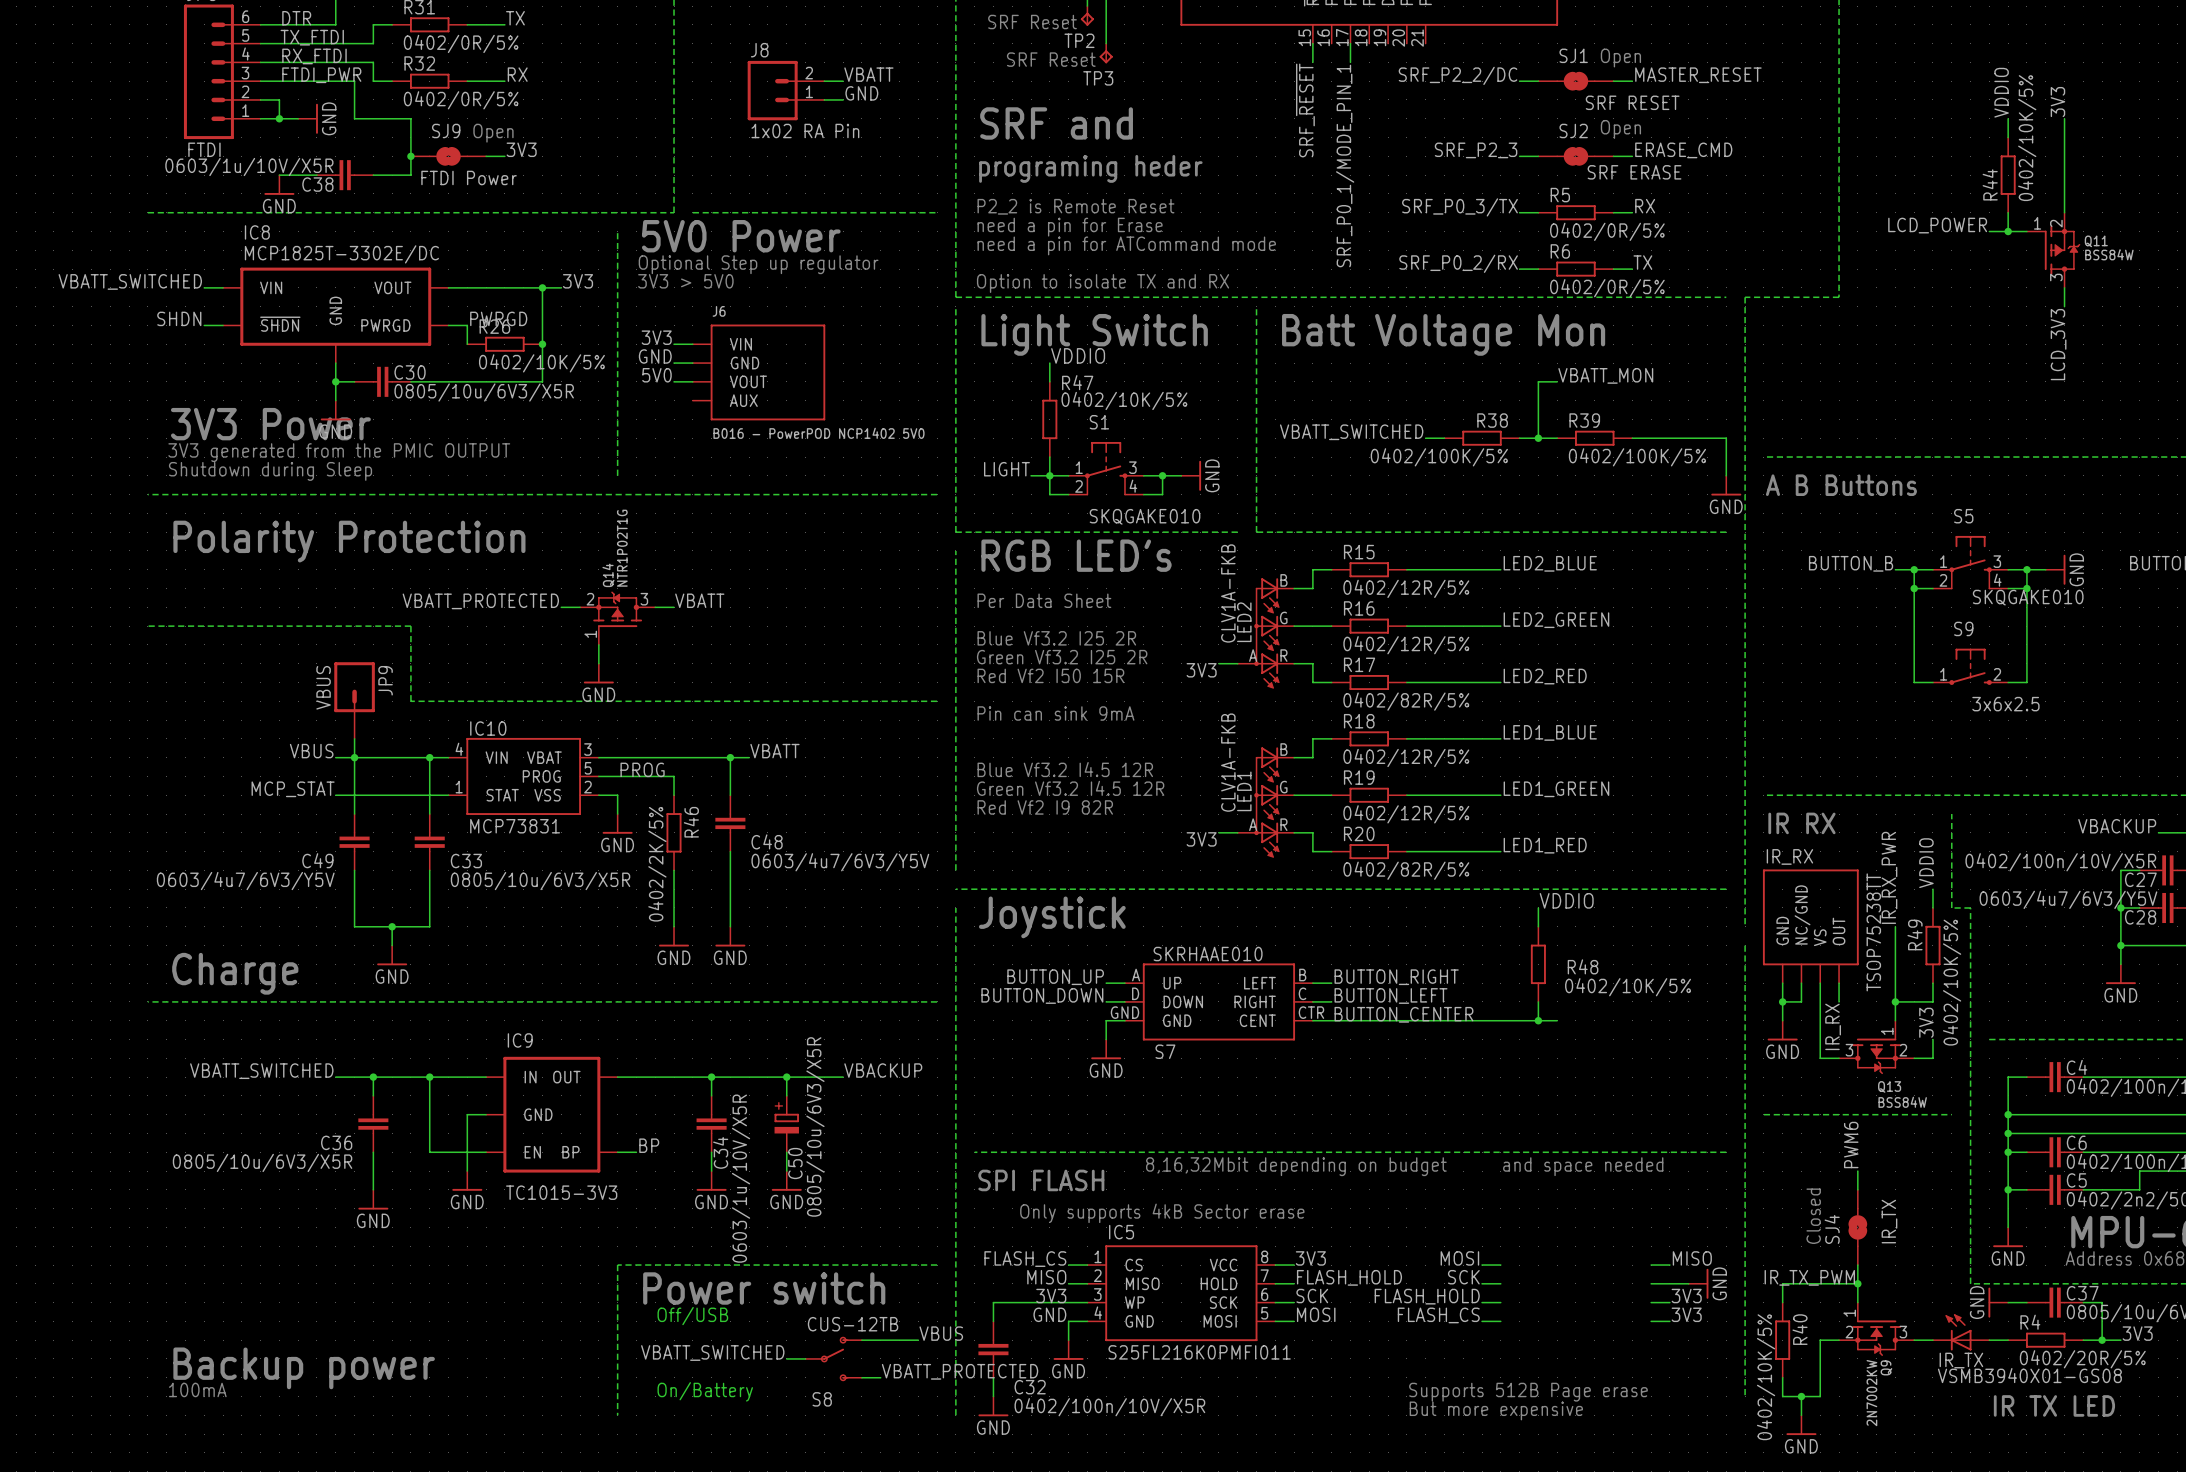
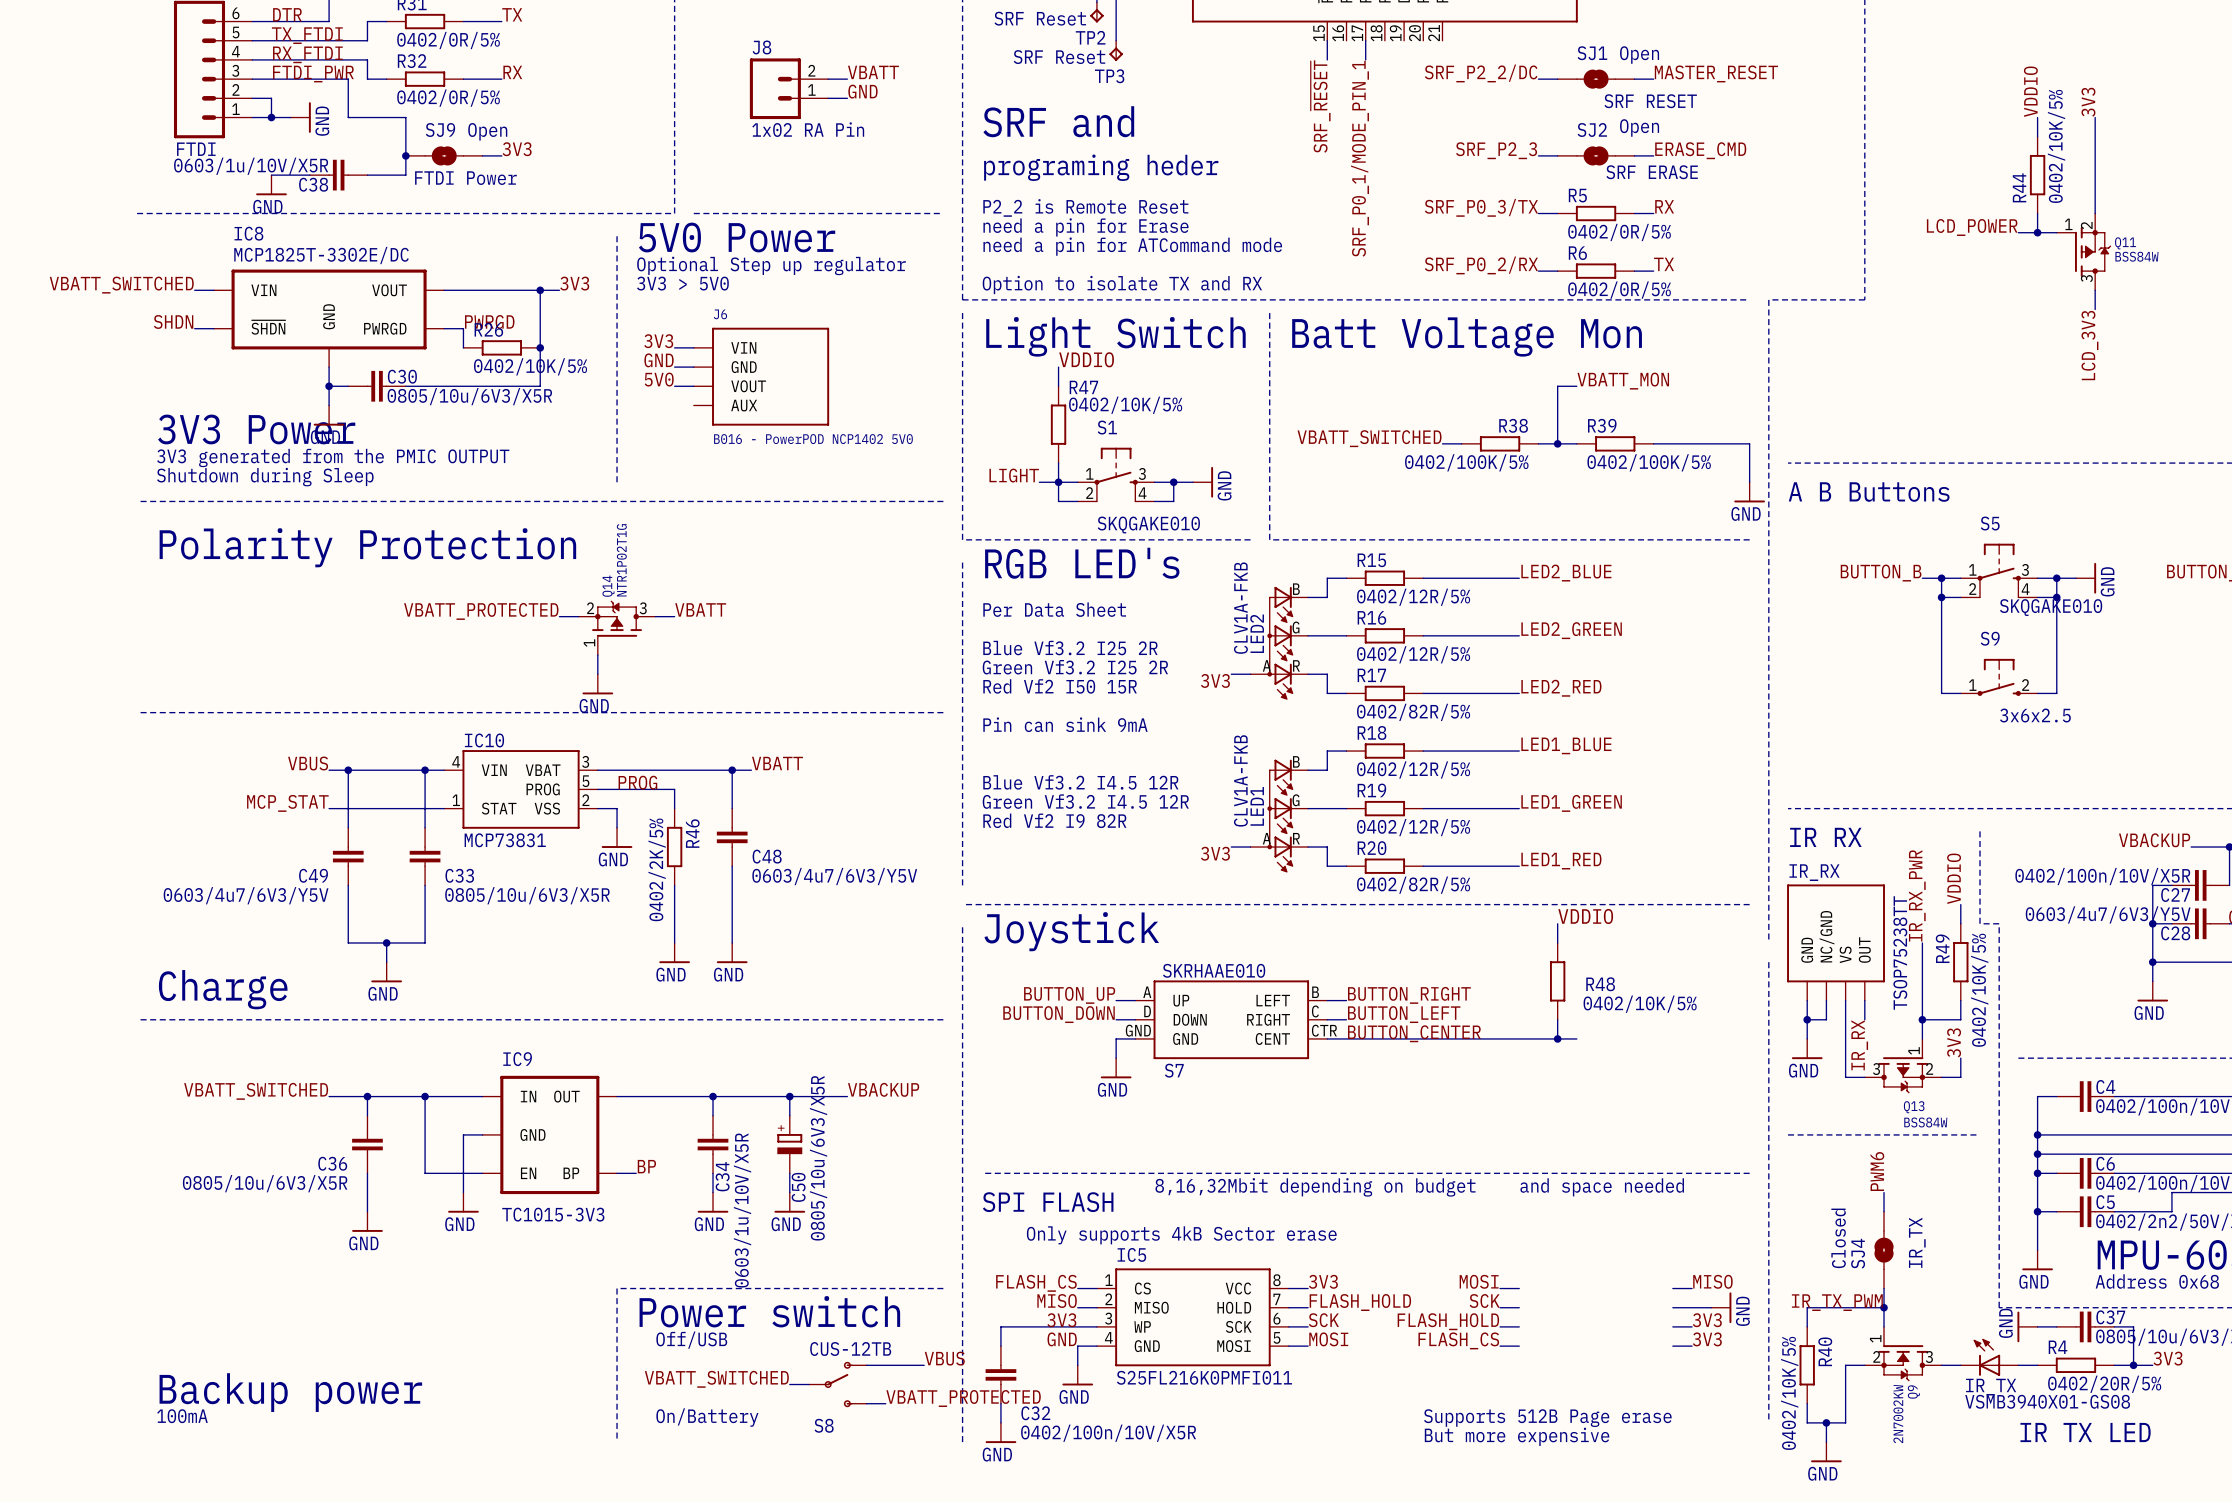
wire: (147, 626) (410, 626) (410, 701) -> (137, 712) (405, 712)
JP9: VBUS (354, 700) -> none
wire: (354, 738) (354, 757) -> none

